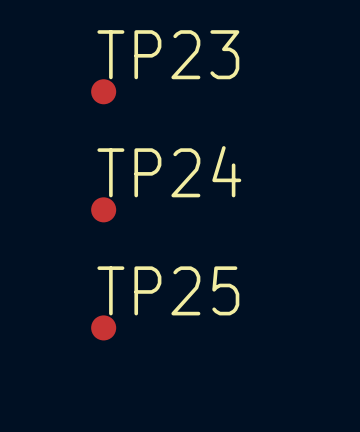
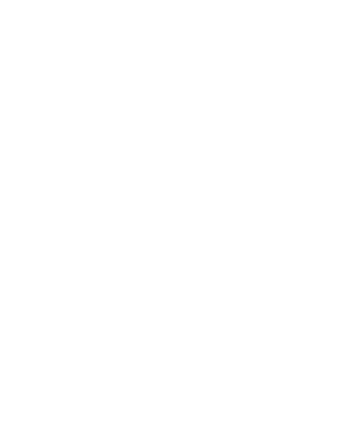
TP23: (103, 91) -> none
TP24: (103, 209) -> none
TP25: (103, 327) -> none

